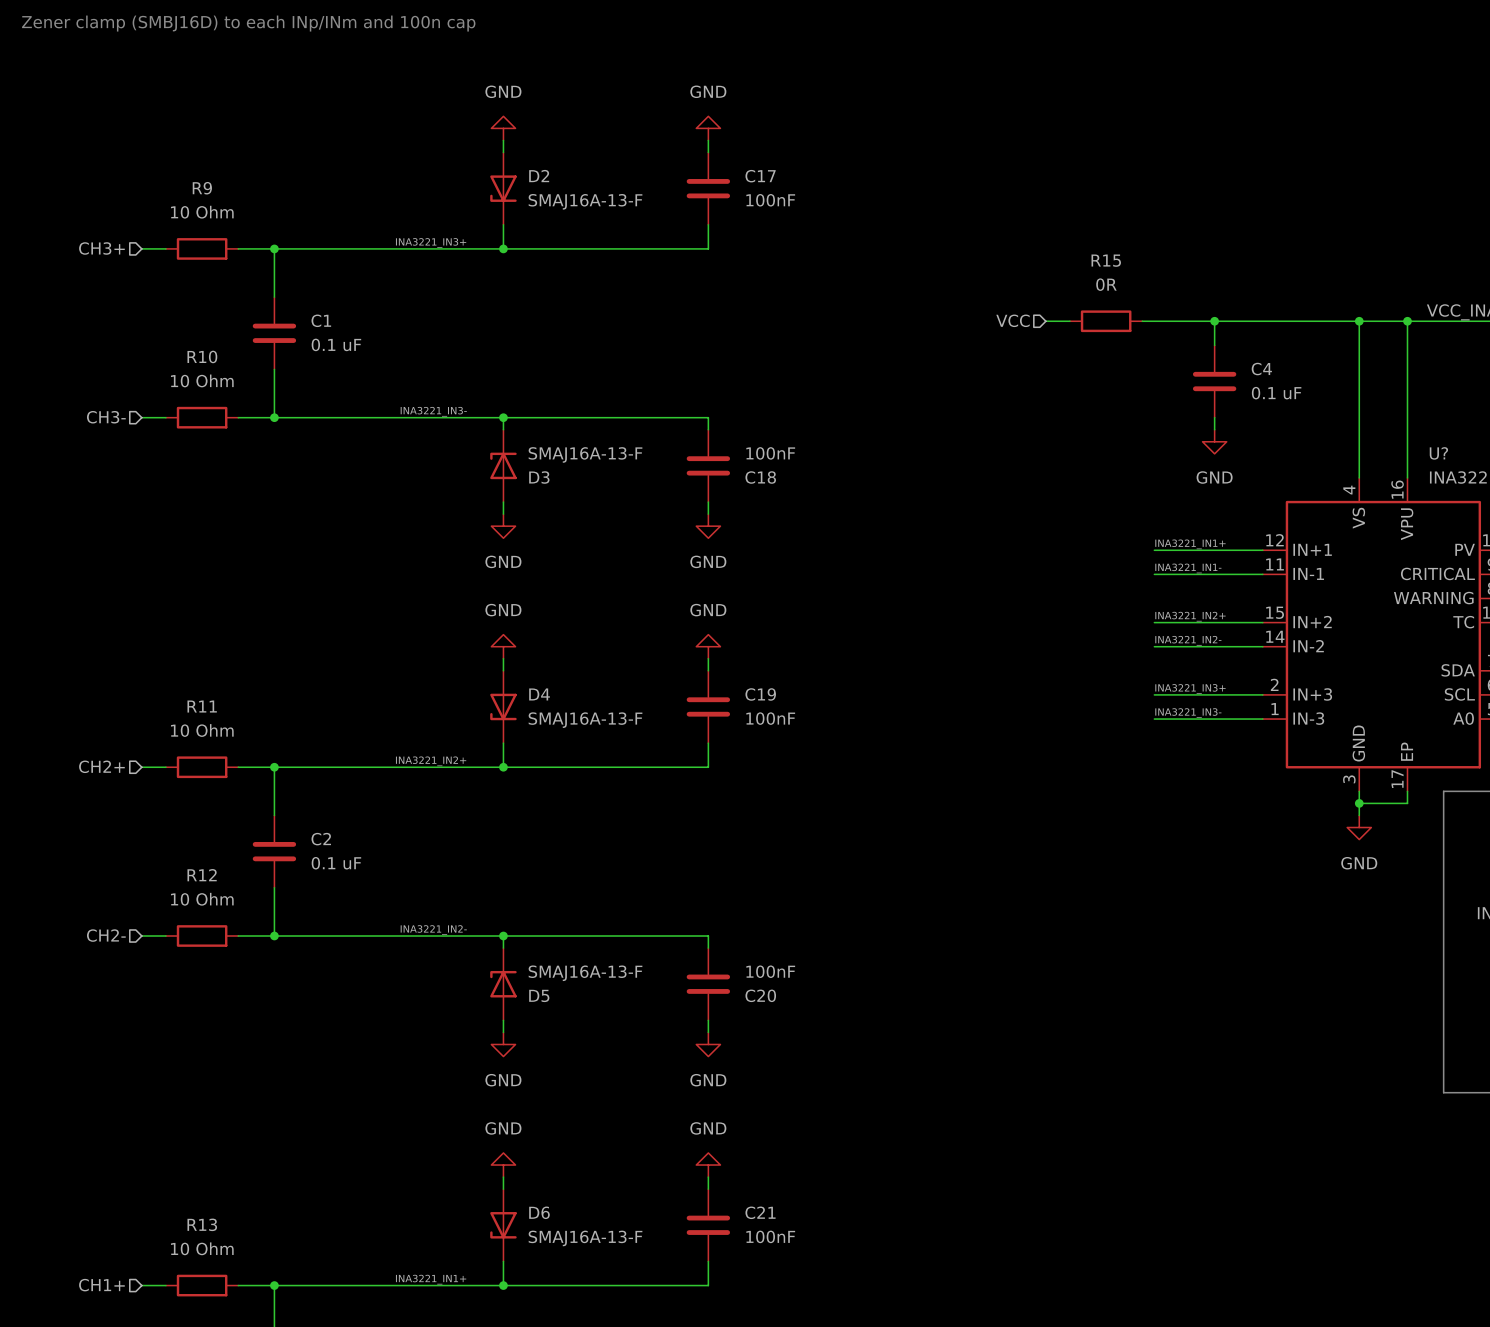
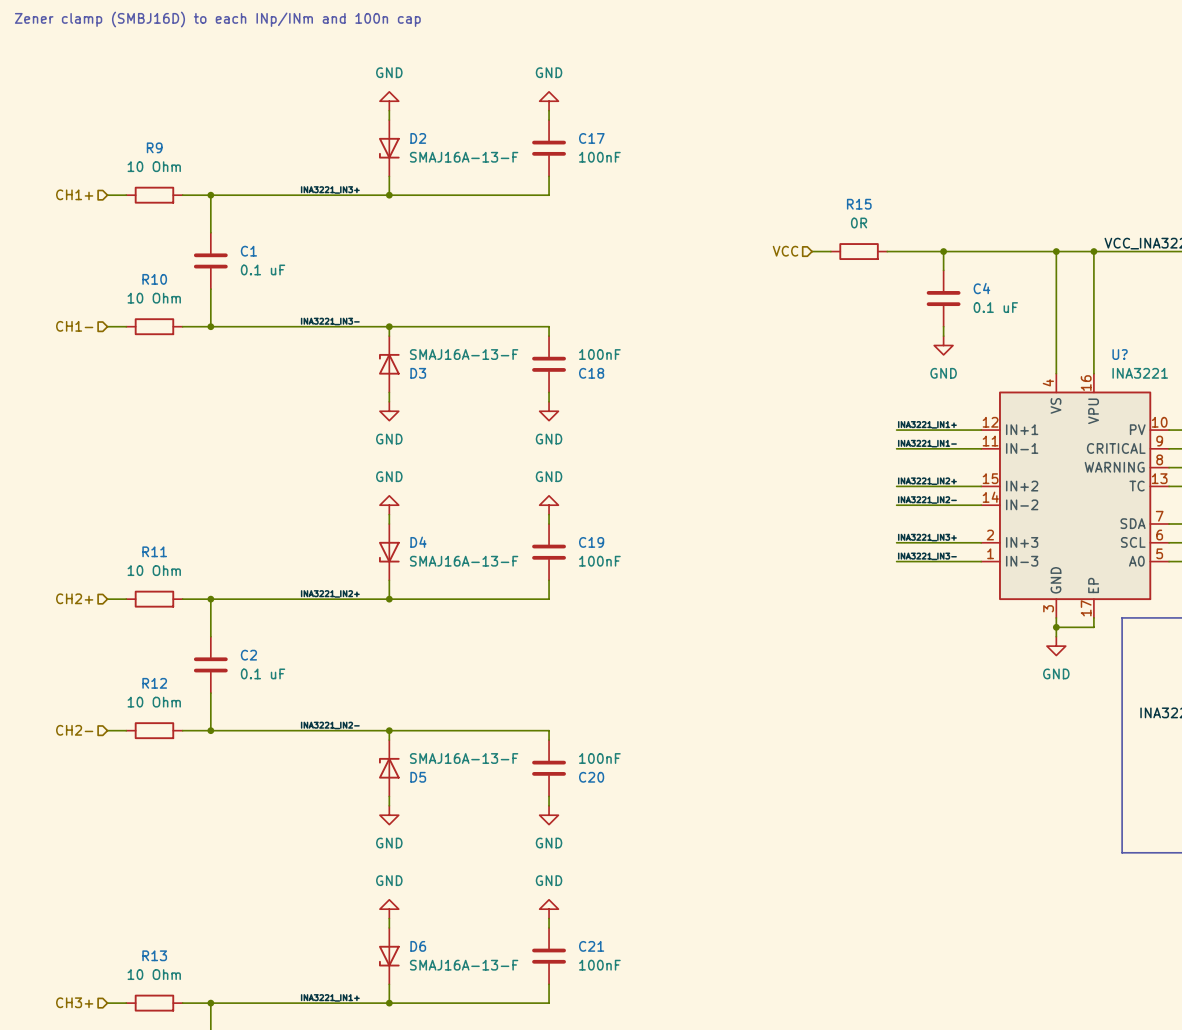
hierarchical label: CH3+ (101, 248) -> CH1+ (74, 194)
hierarchical label: CH3- (106, 417) -> CH1- (74, 326)
hierarchical label: CH1+ (101, 1285) -> CH3+ (74, 1002)

